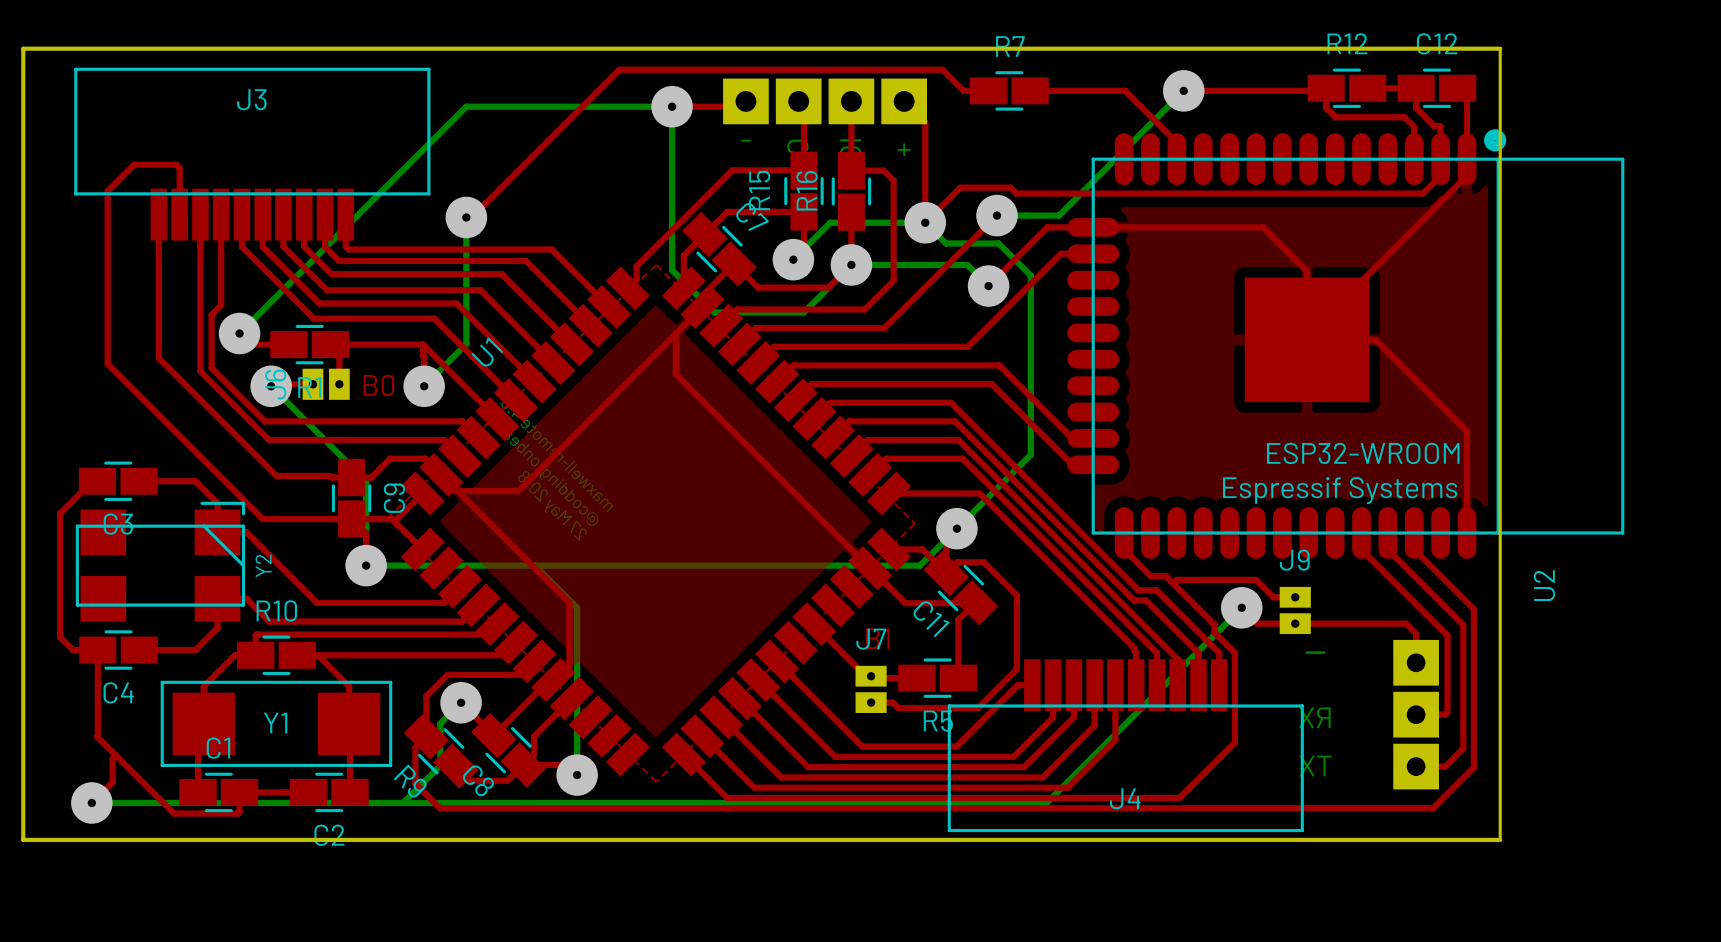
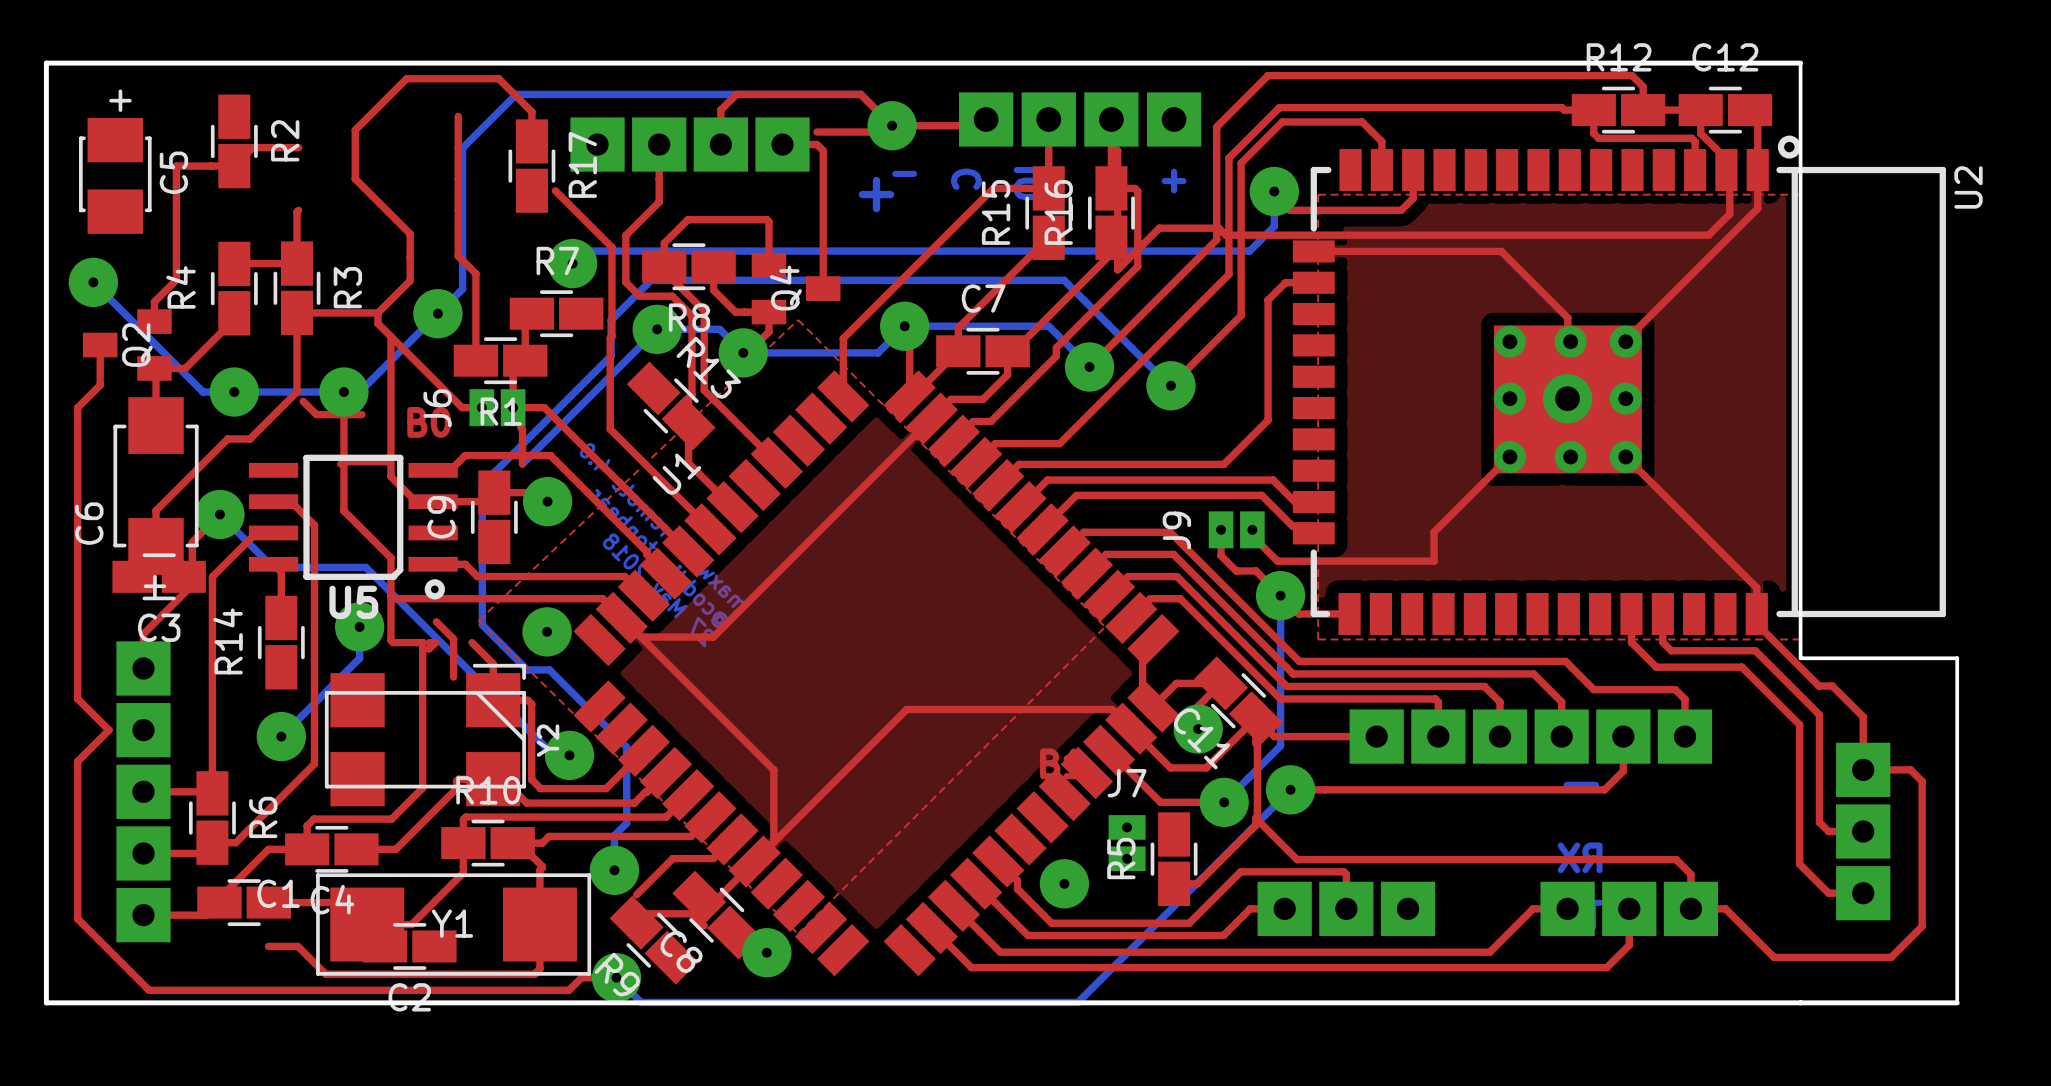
top track: (1326, 88) (1323, 90) (1183, 90) -> (1593, 110) (1564, 110) (1561, 107) (1279, 107) (1228, 158) (1228, 274) (1059, 443) (995, 443) (976, 462)
top track: none -> (1643, 110) (1643, 86) (1632, 75) (1268, 75) (1216, 126) (1216, 239) (1089, 366)
top track: (988, 90) (963, 90) (942, 69) (619, 69) (471, 217) (466, 217) -> none
R7 position: (1009, 90) -> (556, 313)
top track: (1030, 90) (1125, 90) (1176, 142) (1176, 159) -> none
bottom track: (1183, 90) (1059, 215) (996, 215) -> none
via: (1183, 90) -> none
top track: none -> (458, 116) (458, 256) (475, 273) (475, 360)
top track: (1464, 94) (1467, 97) (1467, 175) (1307, 335) -> (1757, 117) (1757, 208) (1434, 532) (1434, 561) (1277, 561) (1252, 536) (1252, 529)
top track: none -> (986, 119) (979, 125) (892, 125) (860, 94) (736, 94) (720, 110) (720, 144)
top track: none -> (1048, 119) (1048, 188) (993, 188) (843, 338) (843, 396)
top track: none -> (1111, 119) (1111, 188) (1134, 188) (1137, 191) (1137, 266) (1056, 347) (1056, 356) (990, 421) (973, 421) (954, 440)
bottom track: none -> (892, 125) (860, 94) (516, 94) (462, 148) (462, 289) (359, 392) (203, 392) (93, 282)
top track: (798, 101) (803, 106) (803, 170) (732, 170) (636, 266) (636, 279) (627, 288) -> none
part position: (825, 101) -> (1080, 119)
top track: (851, 101) (851, 170) (883, 170) (893, 180) (893, 280) (864, 309) (737, 309) (721, 325) -> none
via position: (672, 106) -> (892, 125)
top track: (1330, 111) (1335, 117) (1404, 117) (1414, 126) (1414, 159) -> (1598, 138) (1691, 138) (1695, 141) (1695, 170)
R2: none -> (234, 141)
top track: none -> (531, 141) (531, 111) (498, 78) (406, 78) (355, 130) (355, 179) (410, 233) (410, 280) (377, 312)
top track: none -> (659, 144) (659, 202) (625, 235) (625, 282) (639, 296) (672, 296) (692, 315) (692, 394) (688, 398) (688, 463) (732, 507)
part: none -> (690, 144)
top track: none -> (782, 144) (817, 144) (823, 150) (823, 288)
top track: none -> (298, 147) (252, 147) (234, 166) (176, 166) (176, 279) (154, 301) (154, 321) (158, 325)
U2 footprint: [1067, 129, 1625, 559] -> [1292, 135, 1946, 635]
R17: none -> (531, 166)
top track: none -> (1381, 170) (1381, 141) (1362, 121) (1282, 121) (1241, 163) (1241, 315) (1170, 385)
top track: none -> (1413, 170) (1413, 198) (1401, 210) (1289, 210) (1274, 194) (1274, 191)
C5: none -> (115, 175)
text position: + (904, 149) -> + (1174, 181)
J3: (252, 154) -> none
top track: none -> (555, 190) (611, 247) (610, 429) (710, 529)
bottom track: none -> (1274, 191) (1274, 226) (1249, 251) (588, 251) (575, 263)
via: none -> (1274, 191)
text: none -> + (876, 194)
top track: none -> (298, 210) (296, 211) (296, 263) (234, 263)
R15 position: (803, 191) -> (1048, 213)
R16 position: (851, 191) -> (1111, 213)
top track: none -> (1048, 237) (958, 327) (958, 351) (913, 396) (909, 396) (909, 331) (904, 326)
top track: none -> (1111, 237) (1111, 253) (1013, 351) (1007, 351) (1007, 374) (983, 399) (951, 399) (713, 637) (640, 637)
top track: none -> (1313, 251) (1501, 251) (1567, 318) (1567, 399)
top track: (851, 212) (851, 264) (828, 287) (758, 287) (734, 263) (702, 295) (702, 306) (518, 490) (457, 490) -> none
top track: (158, 214) (158, 358) (276, 475) (371, 477) (390, 458) (425, 458) (569, 602) (569, 663) (553, 679) (549, 679) (493, 735) (461, 702) -> none
top track: (179, 214) (179, 168) (176, 164) (134, 164) (107, 191) (107, 363) (262, 519) (397, 519) (422, 493) -> none
top track: (200, 214) (200, 371) (269, 440) (443, 440) (460, 456) -> none
top track: (221, 214) (221, 305) (211, 314) (211, 368) (264, 421) (462, 421) (478, 437) -> none
top track: (241, 214) (241, 246) (313, 318) (434, 318) (515, 400) -> none
top track: (262, 214) (262, 246) (319, 303) (456, 303) (534, 381) -> none
top track: (283, 214) (283, 246) (326, 290) (480, 290) (553, 362) -> none
top track: (304, 214) (304, 246) (331, 274) (501, 274) (571, 344) -> none
top track: (325, 214) (325, 246) (339, 260) (525, 260) (590, 325) -> none
top track: (345, 214) (345, 246) (348, 249) (551, 249) (609, 306) -> none
top track: (996, 215) (884, 328) (755, 328) (739, 344) -> none
via: (996, 215) -> none
bottom track: (466, 217) (466, 344) -> (1089, 366) (1048, 326) (904, 326) (878, 352) (743, 352) (719, 329) (657, 329) (572, 413)
top track: none -> (768, 265) (768, 221) (766, 219) (687, 219) (664, 243) (664, 270) (704, 310) (704, 390) (776, 462)
R8: none -> (688, 266)
top track: none -> (713, 266) (713, 290) (735, 312) (768, 312) (768, 331) (747, 352) (743, 352)
via: (925, 222) -> none
via: none -> (93, 282)
top track: none -> (1313, 282) (1285, 282) (1268, 300) (1268, 420) (1223, 464) (1018, 464) (998, 485)
R4: none -> (234, 288)
R3: none -> (296, 288)
Q4: none -> (796, 288)
C7 rotation: 0° (719, 249) -> 45° counterclockwise (983, 351)
C7 position: (719, 249) -> (983, 351)
top track: (1093, 253) (1061, 253) (967, 346) (774, 346) (758, 362) -> none
top track: none -> (377, 312) (377, 323) (462, 407) (481, 407)
top track: none -> (377, 312) (296, 312) (296, 392) (250, 439) (227, 439) (156, 510) (156, 546)
via: none -> (437, 313)
top track: none -> (531, 313) (525, 320) (525, 360) (513, 372) (513, 407) (544, 407) (688, 551)
top track: (793, 259) (803, 249) (803, 211) (727, 211) (683, 255) (683, 288) -> none
bottom track: (793, 259) (830, 222) (925, 222) (946, 243) (998, 243) (1030, 275) (1030, 454) (919, 565) (366, 565) (366, 481) (271, 386) -> none
via position: (793, 259) -> (904, 326)
top track: none -> (234, 319) (185, 368) (154, 368) (156, 370) (156, 425)
via: (851, 264) -> none
via: none -> (657, 329)
top track: none -> (390, 336) (390, 476) (415, 501) (485, 501) (494, 492) (538, 492) (547, 501)
top track: none -> (100, 345) (100, 385) (77, 407) (77, 698) (108, 730) (77, 761) (77, 918) (149, 990) (569, 990) (581, 977) (616, 977)
Q2: none -> (127, 345)
top track: (988, 286) (1047, 227) (1263, 227) (1307, 271) (1307, 339) (1375, 339) (1467, 431) (1467, 532) -> none
bottom track: (988, 286) (967, 264) (851, 264) (803, 312) (714, 312) (672, 270) (672, 106) (466, 106) (239, 333) -> none
via position: (988, 286) -> (1170, 385)
via: none -> (743, 352)
via: none -> (1089, 366)
bottom track: none -> (1170, 385) (1064, 280) (651, 280) (611, 320) (611, 355) (482, 484) (482, 624) (527, 669) (549, 669) (626, 747) (626, 823) (614, 835) (614, 870)
via: none -> (234, 392)
top track: none -> (343, 392) (343, 510) (390, 557) (390, 640) (393, 642) (422, 642) (422, 788) (391, 819) (314, 819) (307, 825) (307, 849) (268, 849) (219, 898) (219, 902) (206, 915) (143, 915)
via: none -> (343, 392)
top track: none -> (1567, 398) (1756, 587) (1756, 623) (1818, 686) (1832, 686) (1863, 716) (1863, 769) (1910, 769) (1922, 781) (1922, 926) (1891, 957) (1774, 957) (1725, 908) (1690, 908) (1690, 874) (1676, 859) (1297, 859) (1255, 818)
via: (239, 333) -> none
top track: (675, 333) (675, 374) (905, 603) (975, 602) (958, 619) (958, 678) -> none
R13: none -> (671, 405)
R1 position: (309, 344) -> (500, 360)
top track: (777, 381) (793, 365) (999, 365) (1046, 412) -> (1042, 529) (1076, 495) (1261, 495)
J6 position: (326, 384) -> (497, 407)
top track: (339, 384) (339, 353) (330, 344) (423, 344) (497, 418) -> none
text position: B0 (378, 385) -> B0 (429, 422)
via: (271, 386) -> none
via position: (424, 386) -> (547, 501)
top track: none -> (433, 470) (450, 470) (465, 455) (550, 455) (666, 573)
top track: (795, 400) (811, 384) (991, 384) (1072, 464) (1093, 464) -> none
C6: none -> (156, 485)
top track: none -> (273, 501) (290, 501) (314, 525) (314, 764) (235, 842) (212, 842) (201, 853) (143, 853)
top track: (814, 418) (830, 402) (951, 402) (1138, 590) (1156, 590) (1219, 653) (1219, 685) -> none
top track: none -> (1313, 502) (1295, 502) (1273, 480) (1047, 480) (1020, 507)
top track: none -> (219, 514) (192, 542) (192, 585) (143, 633) (143, 668)
bottom track: none -> (219, 514) (272, 567) (365, 567) (553, 755) (569, 755)
via: none -> (219, 514)
top track: (833, 437) (849, 421) (955, 421) (1134, 600) (1146, 600) (1198, 653) (1198, 685) -> none
U5: none -> (353, 527)
top track: none -> (1221, 529) (1221, 555) (1236, 570) (1255, 570) (1298, 614) (1349, 614)
top track: none -> (273, 532) (256, 532) (212, 576) (212, 793) (210, 791) (143, 791)
top track: (851, 456) (867, 440) (958, 440) (1177, 659) (1177, 685) -> none
top track: none -> (1064, 551) (1083, 532) (1170, 532) (1299, 661) (1565, 661) (1593, 689) (1675, 689) (1685, 699) (1685, 736)
top track: none -> (273, 564) (281, 572) (281, 617)
top track: none -> (433, 564) (465, 564) (477, 576) (624, 576) (643, 595)
top track: (870, 474) (886, 458) (962, 458) (1156, 653) (1156, 685) -> none
top track: none -> (1086, 573) (1106, 554) (1173, 554) (1293, 673) (1533, 673) (1561, 702) (1561, 736)
top track: (97, 481) (92, 481) (60, 513) (60, 637) (72, 650) (97, 650) (97, 736) (174, 813) (238, 813) (239, 792) (308, 792) -> none
top track: (138, 481) (195, 481) (217, 503) (217, 532) (246, 532) (317, 602) (443, 602) (460, 586) -> none
top track: (888, 493) (979, 493) (1134, 648) (1136, 685) -> none
top track: none -> (390, 595) (394, 598) (602, 598) (773, 769) (773, 842)
top track: none -> (1109, 595) (1128, 576) (1176, 576) (1286, 686) (1484, 686) (1500, 702) (1500, 736)
bottom track: none -> (1280, 595) (1280, 745) (1224, 802)
via: none -> (1280, 595)
C9 position: (351, 498) -> (494, 517)
C9 name position: C9 (394, 498) -> C9 (441, 517)
top track: none -> (1631, 614) (1631, 642) (1656, 667) (1741, 667) (1799, 724) (1799, 864) (1828, 893) (1863, 893)
top track: none -> (1662, 614) (1662, 642) (1671, 650) (1755, 650) (1819, 714) (1819, 822) (1828, 831) (1863, 831)
top track: none -> (1131, 617) (1150, 598) (1180, 598) (1280, 699) (1435, 699) (1438, 702) (1438, 736)
top track: (392, 519) (422, 549) -> none
U1 position: (655, 521) -> (876, 673)
bottom track: none -> (359, 626) (359, 658) (281, 736)
via: none -> (359, 626)
via: none -> (547, 631)
via: (956, 528) -> none
top track: (1124, 532) (1124, 549) (1150, 576) (1165, 576) (1214, 624) (1214, 632) (1234, 652) (1234, 742) (1179, 797) (727, 797) (683, 754) -> none
top track: (1361, 532) (1361, 549) (1447, 635) (1447, 712) (1445, 714) (1416, 714) -> none
top track: (1387, 532) (1387, 549) (1463, 625) (1463, 748) (1445, 766) (1416, 766) -> none
top track: (1414, 532) (1414, 549) (1473, 609) (1473, 767) (1433, 808) (439, 808) (415, 783) (415, 747) (426, 736) (426, 696) (447, 674) (521, 674) (534, 661) -> none
R14: none -> (281, 642)
top track: none -> (429, 642) (435, 642) (428, 649)
top track: none -> (472, 642) (493, 663) (493, 700) (527, 700) (531, 704) (531, 779) (540, 788) (606, 788) (643, 750)
top track: (888, 549) (922, 549) (946, 573) (957, 562) (983, 562) (1016, 595) (1016, 669) (978, 708) (898, 708) (892, 702) (871, 702) -> none
board edge: (1500, 549) (1500, 839) -> (1800, 658) (1957, 658) (1957, 1002) (1800, 1002)
J9 name position: J9 (1294, 560) -> J9 (1176, 530)
Y2 position: (160, 561) -> (425, 735)
via: (366, 565) -> none
bottom track: (534, 565) (577, 607) (577, 775) -> none
top track: (1173, 583) (1176, 579) (1256, 579) (1273, 597) (1295, 597) -> none
U2 name position: U2 (1544, 585) -> U2 (1968, 187)
C11 position: (960, 588) -> (1238, 700)
top track: none -> (1153, 706) (1176, 683) (1221, 683) (1198, 706) (1198, 729)
top track: none -> (1255, 718) (1206, 767) (1170, 767) (1112, 709) (906, 709) (718, 897) (699, 897)
top track: none -> (1255, 718) (1255, 818)
top track: none -> (1255, 718) (1274, 736) (1376, 736)
top track: (478, 605) (462, 621) (269, 621) (246, 598) (217, 598) (217, 627) (195, 650) (139, 650) -> none
top track: (1241, 607) (1257, 623) (1406, 623) (1416, 633) (1416, 662) (1404, 650) -> none
bottom track: (1241, 607) (1046, 802) (91, 802) -> none
via: (1241, 607) -> none
via: none -> (1198, 729)
J9 rotation: 0° (1295, 610) -> 90° clockwise (1236, 529)
J9 position: (1295, 610) -> (1236, 529)
via: none -> (281, 736)
part: none -> (1530, 736)
top track: none -> (1623, 736) (1623, 771) (1604, 789) (1290, 789)
top track: (497, 624) (486, 634) (256, 634) (255, 655) (234, 655) (203, 686) (203, 723) (198, 729) (198, 792) -> none
top track: (814, 624) (865, 676) (873, 678) (916, 678) -> none
top track: none -> (1109, 750) (1160, 802) (1224, 802)
via: none -> (569, 755)
top track: (515, 642) (503, 655) (297, 655) -> none
top track: none -> (666, 772) (634, 803) (526, 803) (502, 779) (458, 779) (456, 788) (395, 849) (356, 849)
C4 position: (118, 650) -> (331, 849)
R10 position: (276, 655) -> (488, 843)
top track: (317, 655) (349, 686) (349, 792) -> none
bottom track: none -> (1290, 789) (1077, 1002) (641, 1002) (616, 977)
via: none -> (1290, 789)
top track: (777, 661) (862, 746) (956, 746) (1017, 685) (1032, 685) -> none
part: none -> (143, 791)
top track: none -> (688, 795) (666, 817) (465, 817) (463, 819) (463, 872) (411, 924) (367, 924) (345, 902) (268, 902)
via: none -> (1224, 802)
R5 rotation: 0° (937, 678) -> 90° clockwise (1174, 859)
R5 position: (937, 678) -> (1174, 859)
top track: (758, 679) (835, 756) (1013, 756) (1053, 717) (1053, 685) -> none
top track: none -> (710, 817) (691, 836) (548, 836) (542, 843) (512, 843)
R6: none -> (212, 818)
top track: none -> (1255, 818) (1255, 825) (1197, 883) (1174, 883)
top track: (1073, 685) (1073, 717) (1024, 767) (808, 767) (739, 698) -> none
top track: (1094, 685) (1094, 725) (1042, 777) (781, 777) (721, 717) -> none
top track: (1115, 685) (1115, 740) (1067, 787) (754, 787) (702, 735) -> none
J7 position: (871, 689) -> (1127, 843)
part: none -> (1863, 831)
top track: (571, 698) (534, 736) (534, 753) (507, 780) (470, 780) (455, 766) -> none
bottom track: (461, 702) (440, 723) (440, 765) (403, 802) -> none
via: (461, 702) -> none
top track: none -> (732, 839) (713, 858) (672, 858) (636, 894)
top track: none -> (518, 843) (542, 866) (539, 870) (539, 968) (534, 974) (325, 974) (298, 946) (268, 946)
part: (1416, 714) -> none
top track: none -> (998, 861) (1017, 880) (1017, 889) (1051, 923) (1189, 923) (1240, 871) (1343, 871) (1346, 874) (1346, 908)
Y1 position: (276, 723) -> (453, 924)
via: none -> (614, 870)
top track: none -> (976, 883) (1027, 935) (1223, 935) (1250, 908) (1284, 908)
via: none -> (1064, 883)
J4: (1125, 745) -> none
C8 position: (508, 750) -> (716, 915)
R9 position: (441, 751) -> (654, 940)
top track: (116, 755) (112, 758) (112, 782) (91, 802) -> none
top track: none -> (954, 905) (1000, 952) (1489, 952) (1533, 908) (1567, 908)
part: none -> (1346, 908)
top track: none -> (1629, 908) (1629, 945) (1606, 967) (971, 967) (931, 927)
part: none -> (1629, 908)
via: (577, 775) -> none
C1 position: (218, 792) -> (244, 902)
via: none -> (766, 952)
via: (91, 802) -> none
via: none -> (616, 977)

